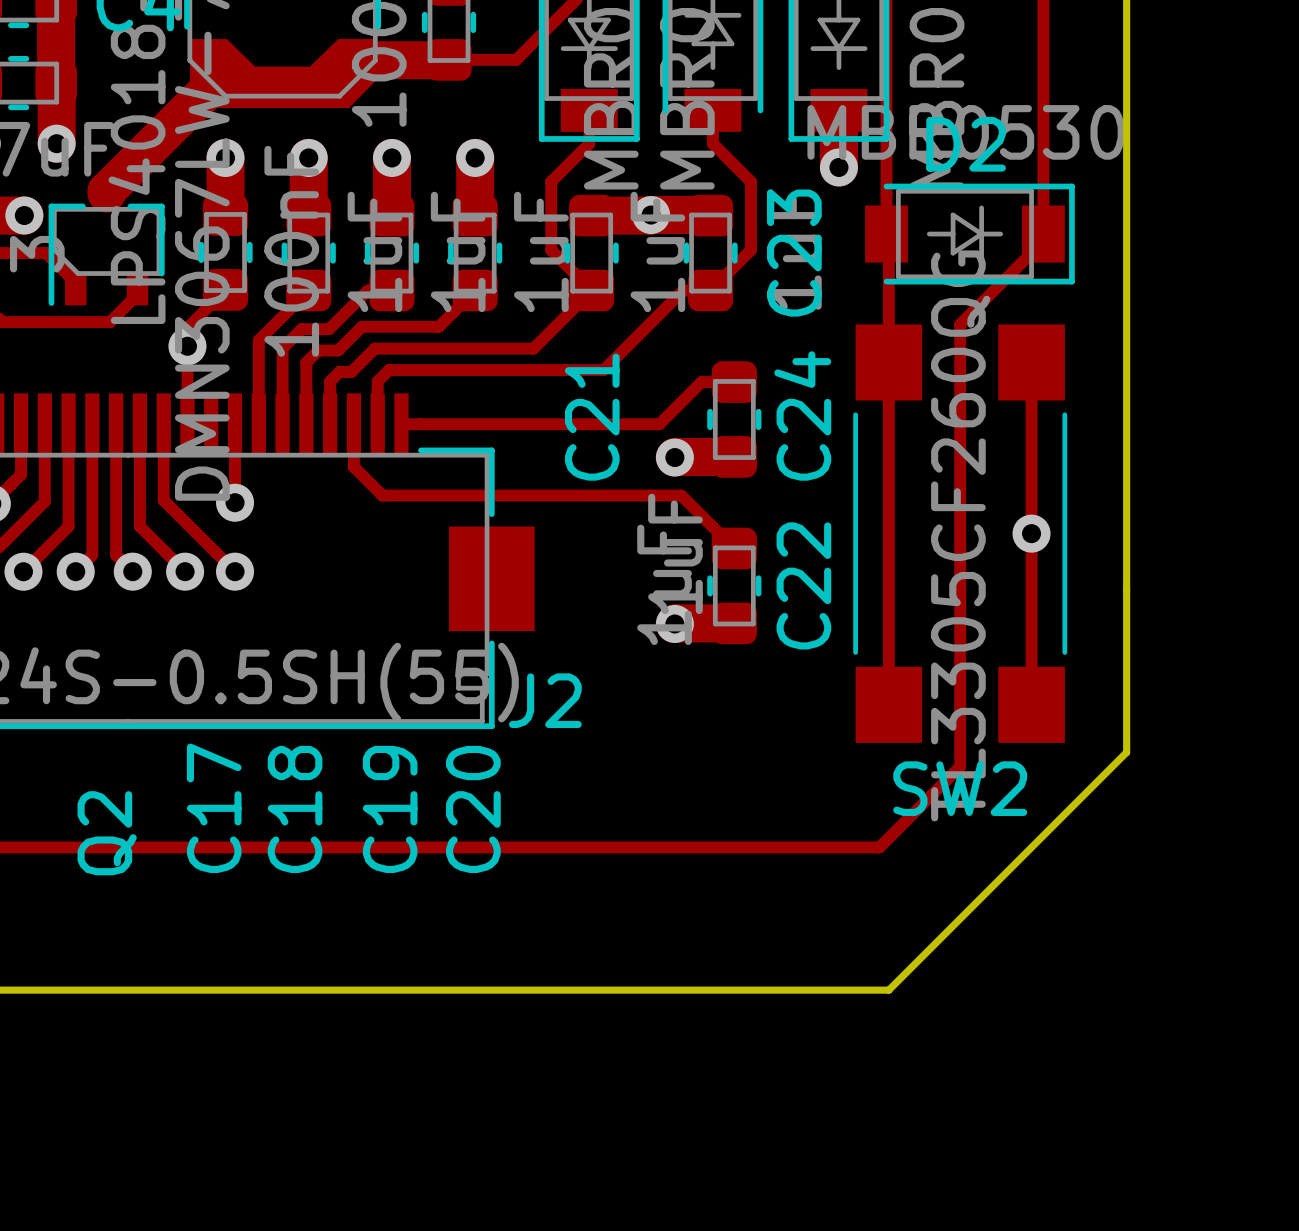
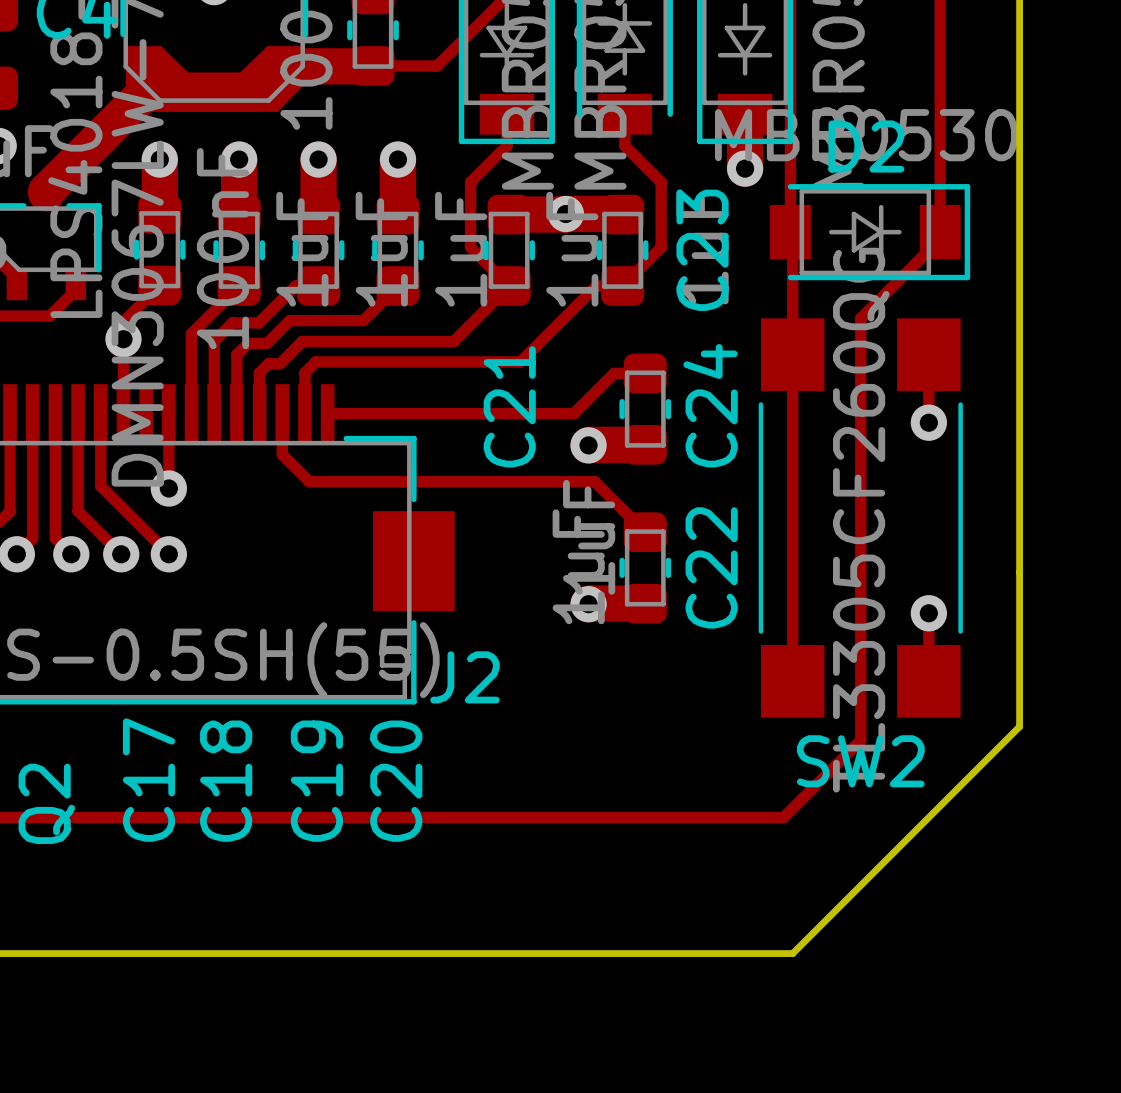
track: (1031, 433) (1031, 633) -> none
via: none -> (928, 422)
via: (1031, 533) -> none
via: none -> (928, 613)

